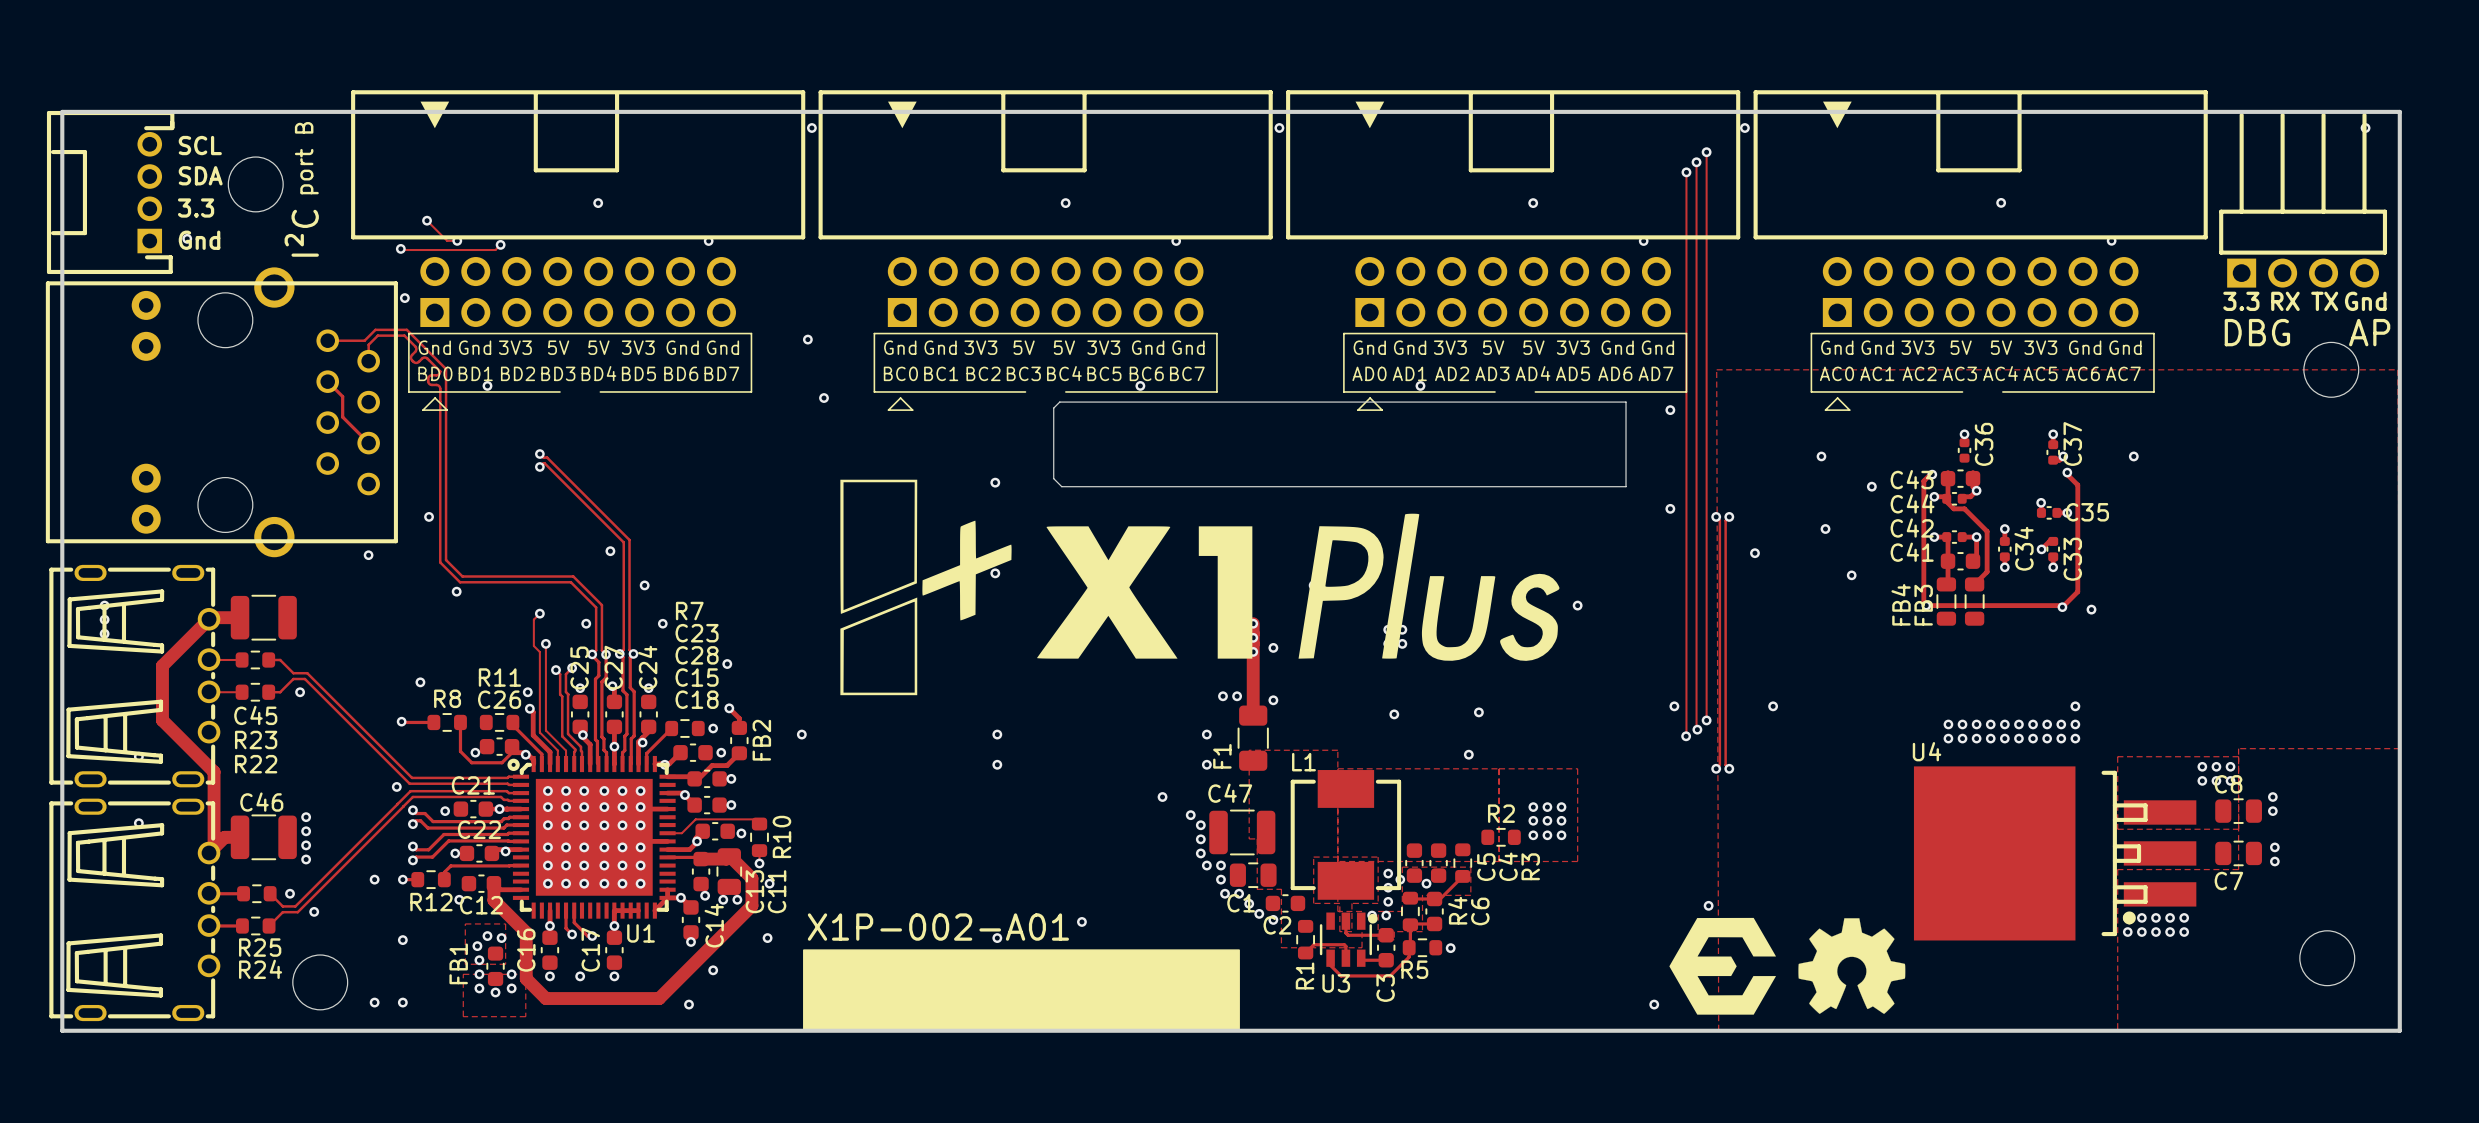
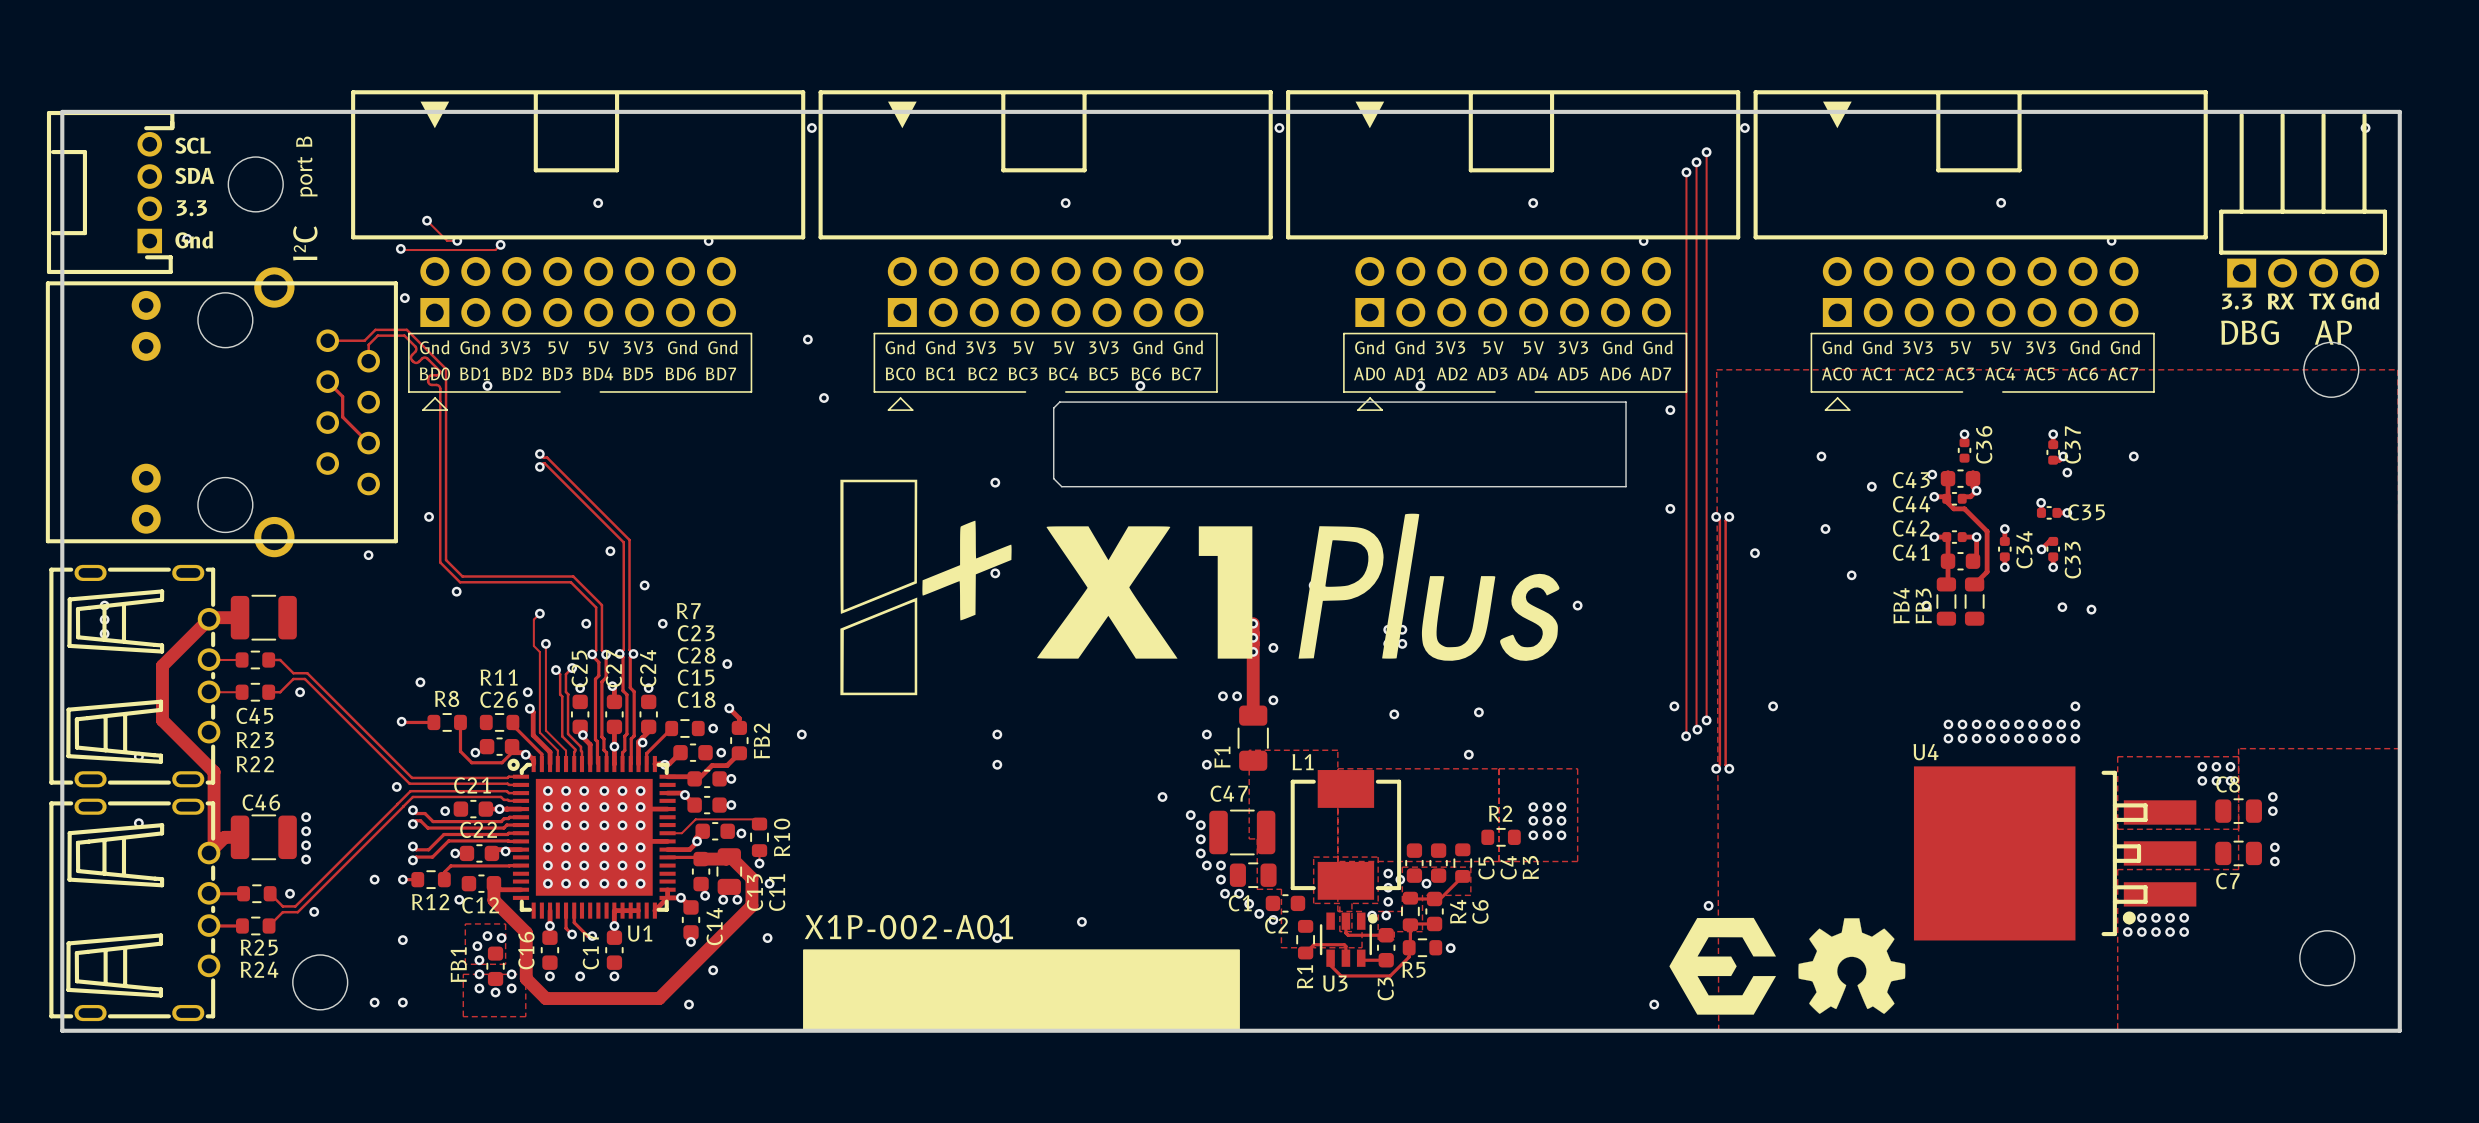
track: (1932, 472) (1923, 481) (1923, 603) (1926, 605) (2060, 605) -> none
track: (2067, 474) (2077, 485) (2077, 591) (2062, 607) -> none

